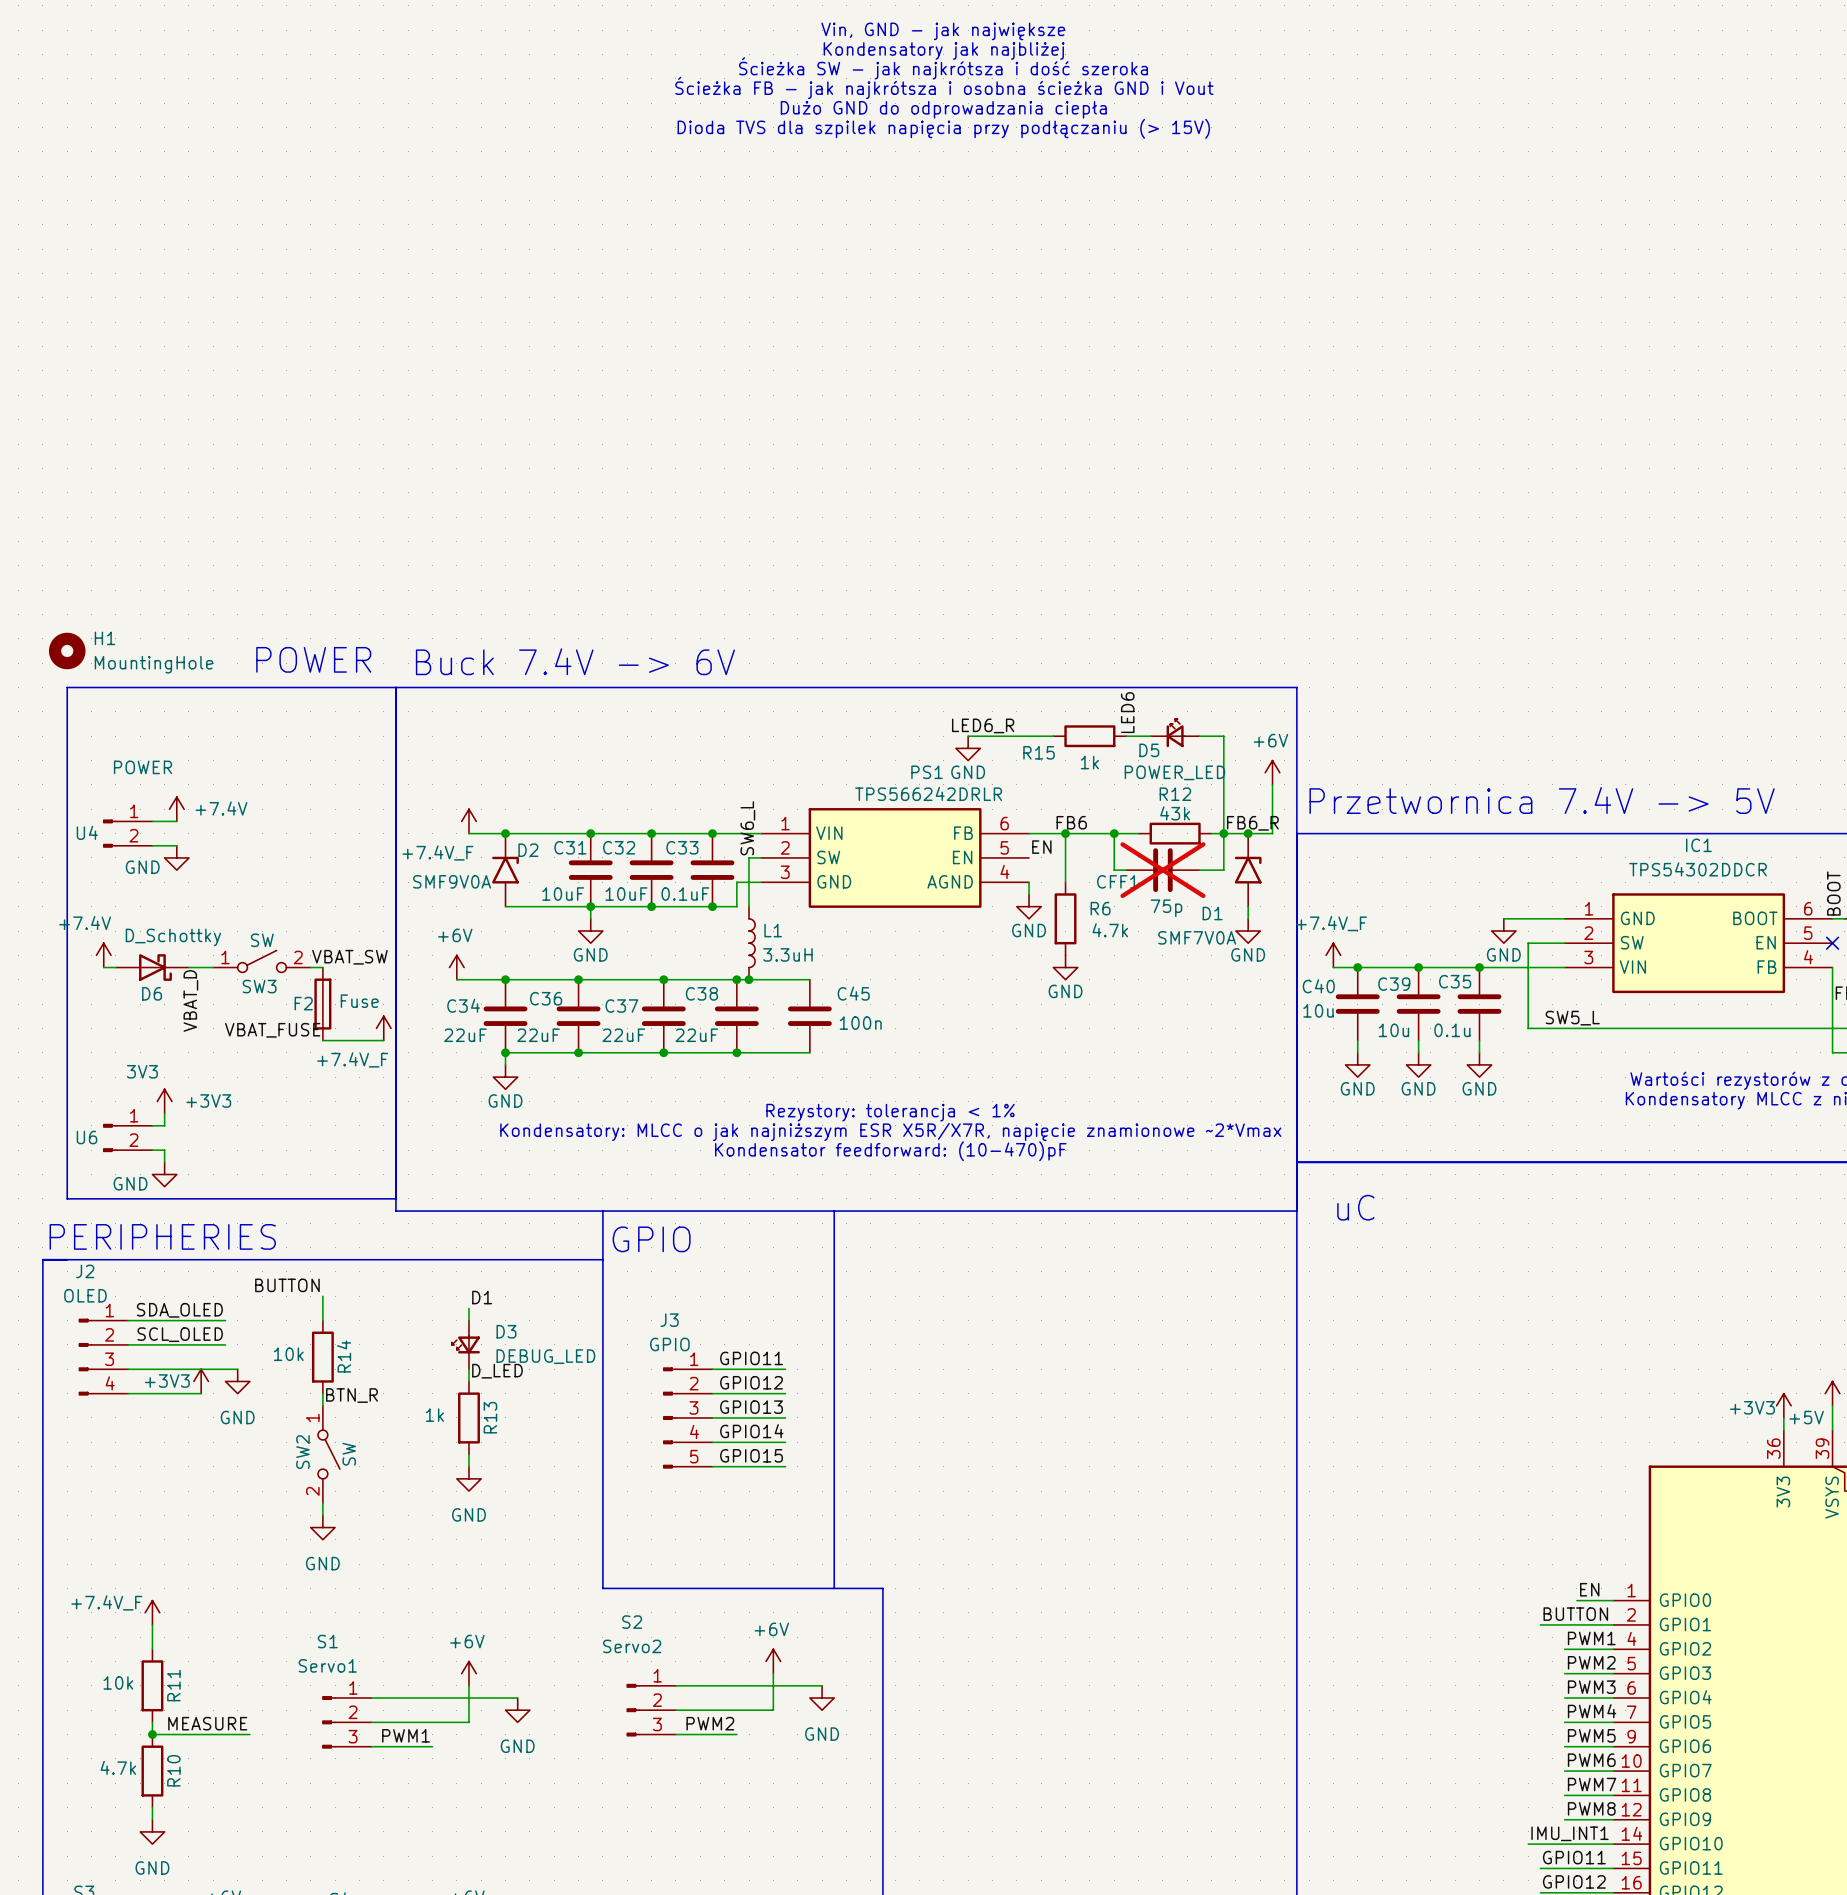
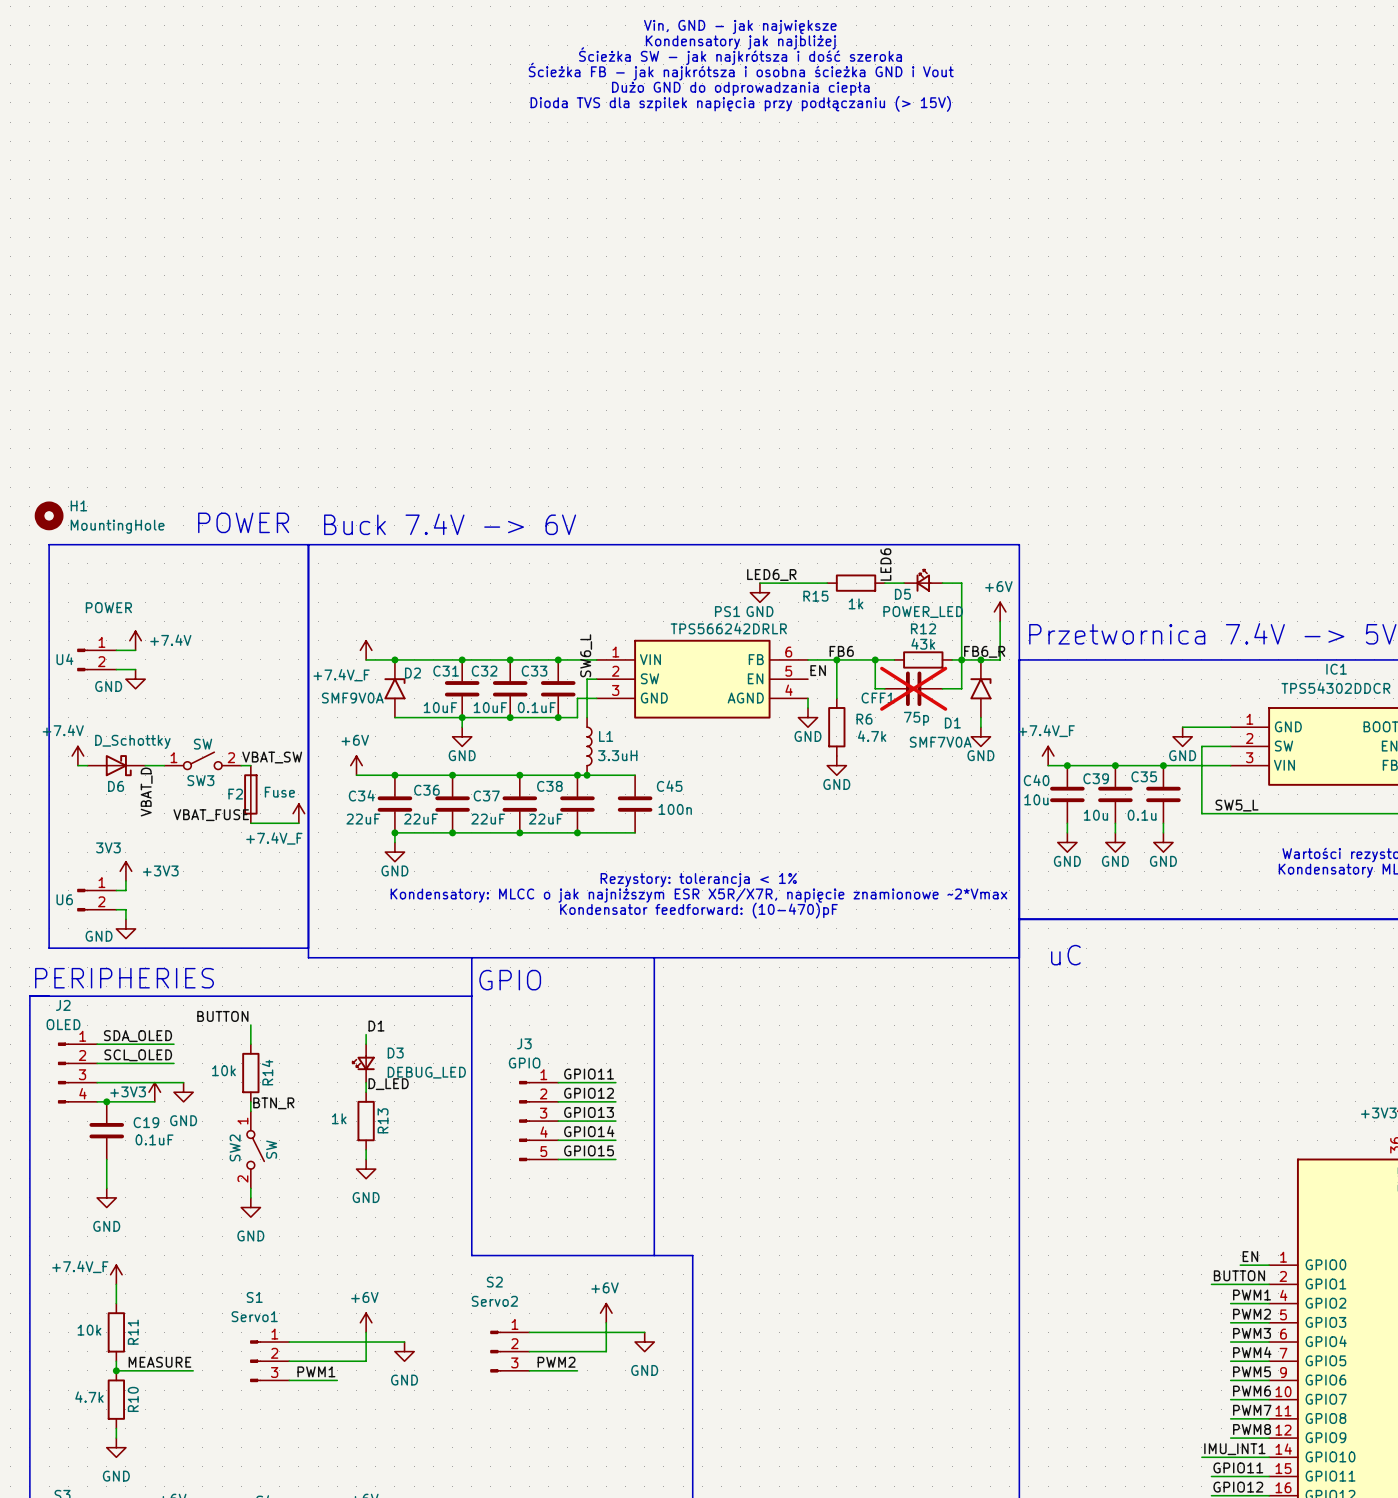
junction: none -> (106, 1101)
C19: none -> 0.1uF (106, 1130)
wire: none -> (106, 1159) (106, 1188)
power symbol: none -> GND (106, 1197)

